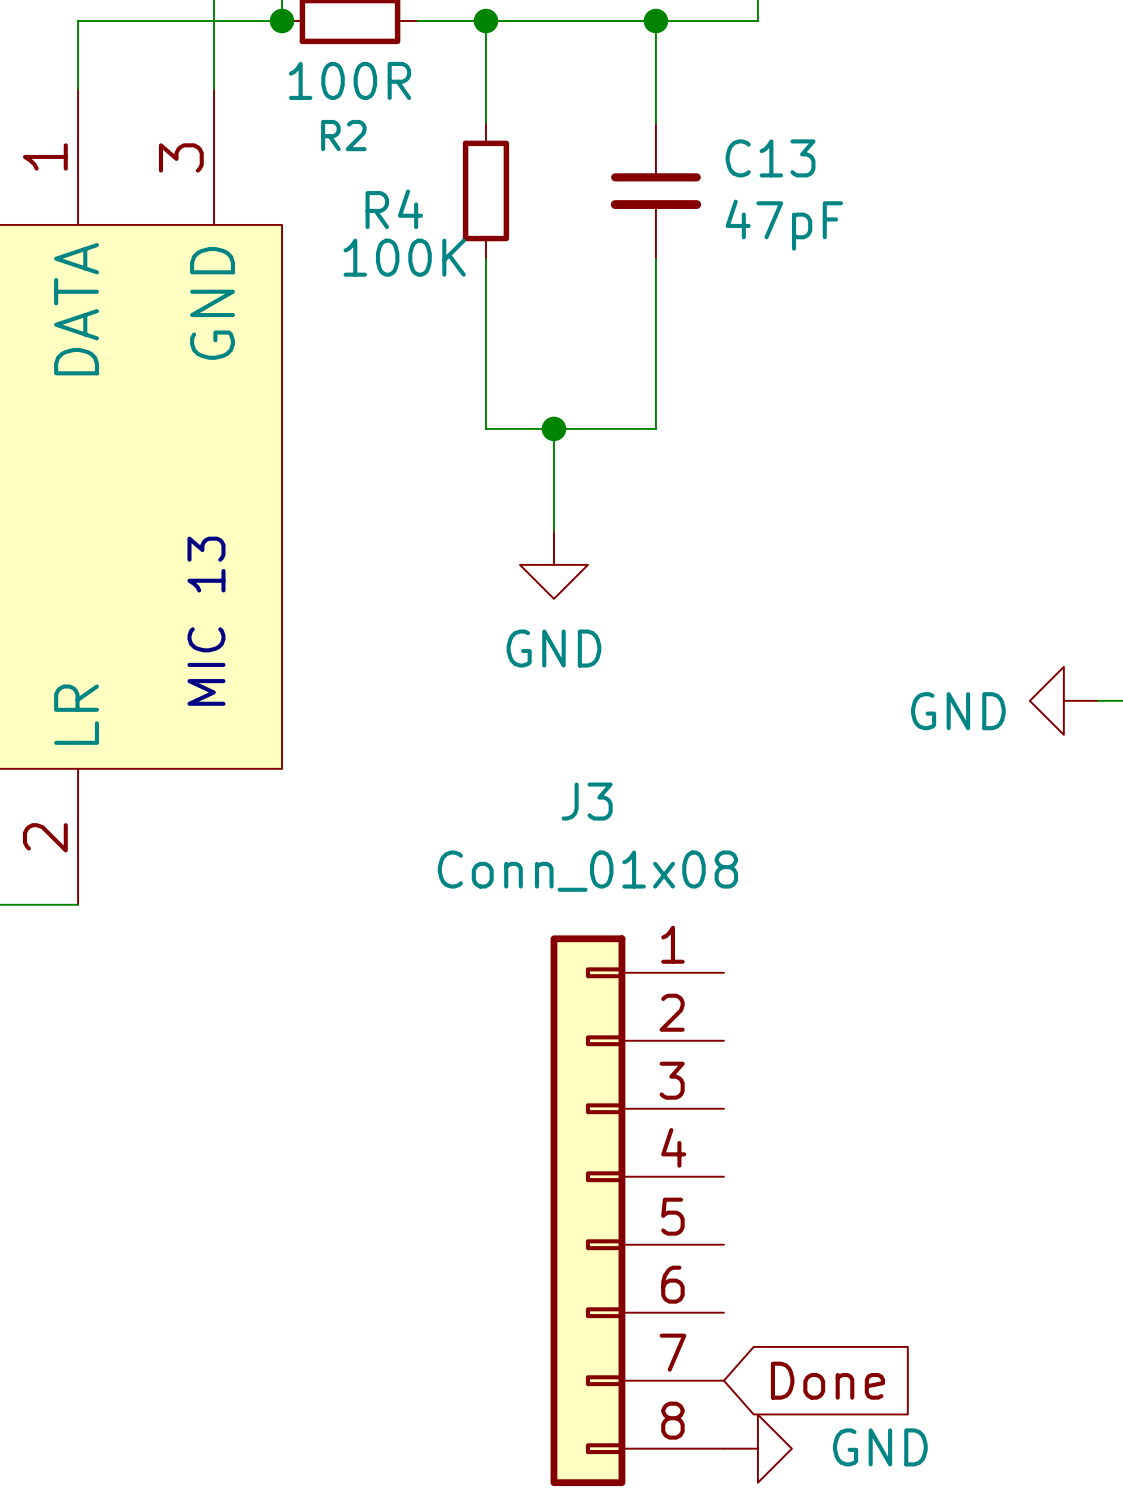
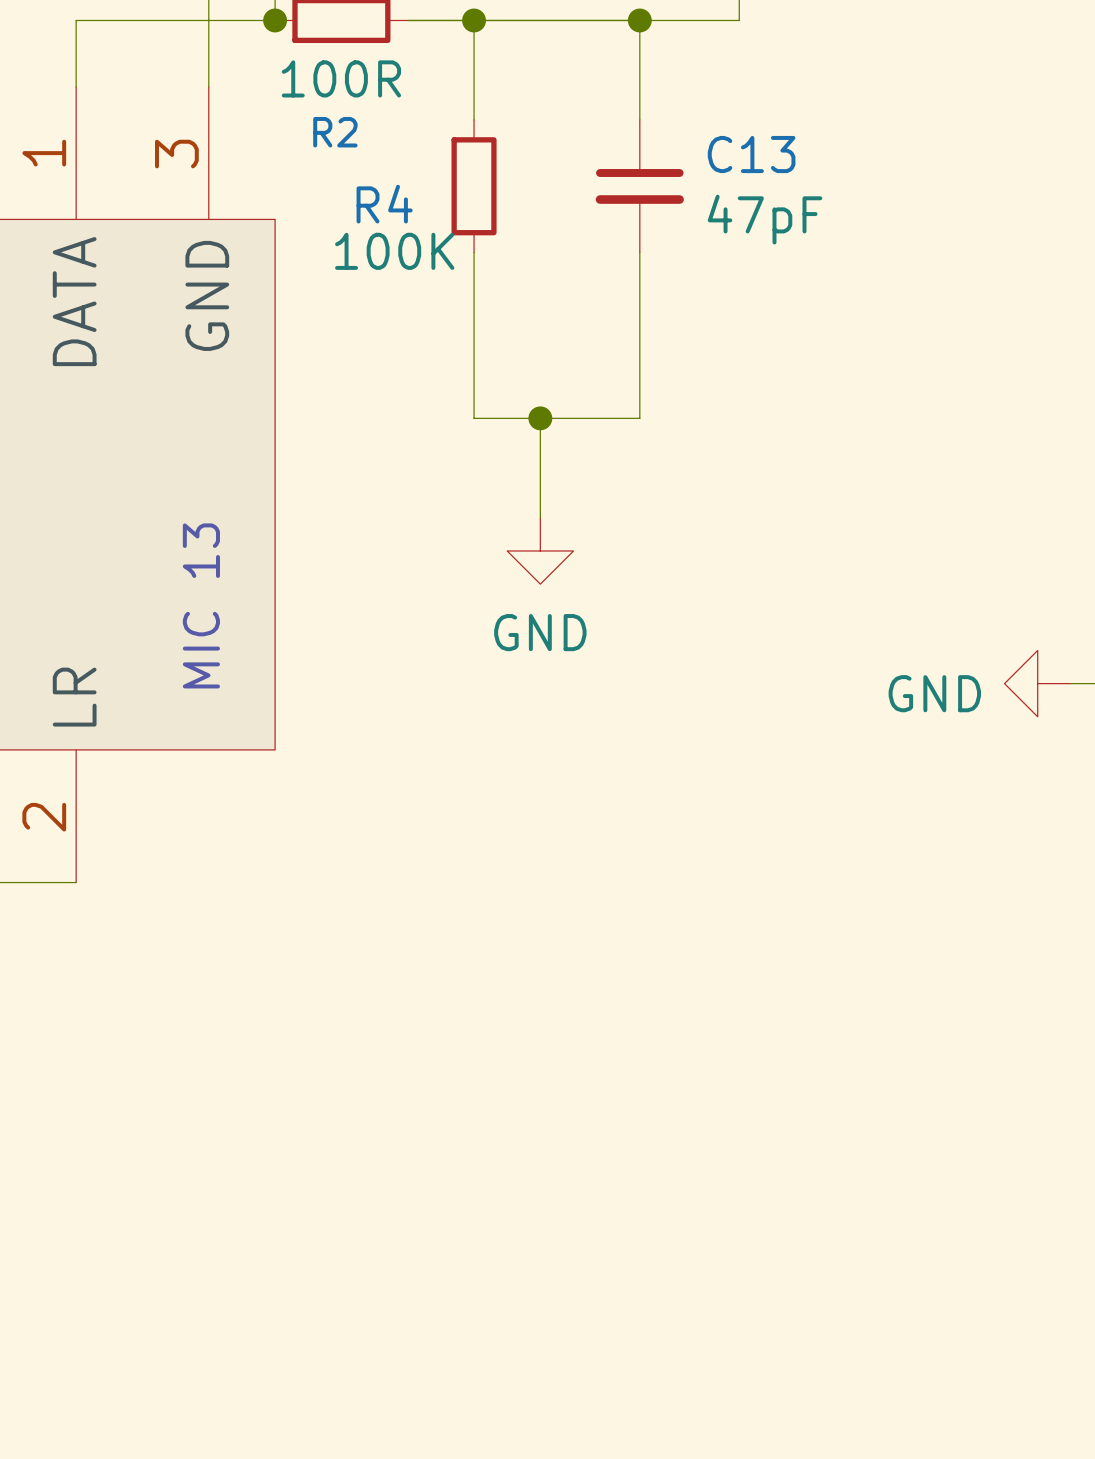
J3: Conn_01x08 (637, 1210) -> none
global label: Done (827, 1380) -> none
power symbol: GND (757, 1448) -> none

